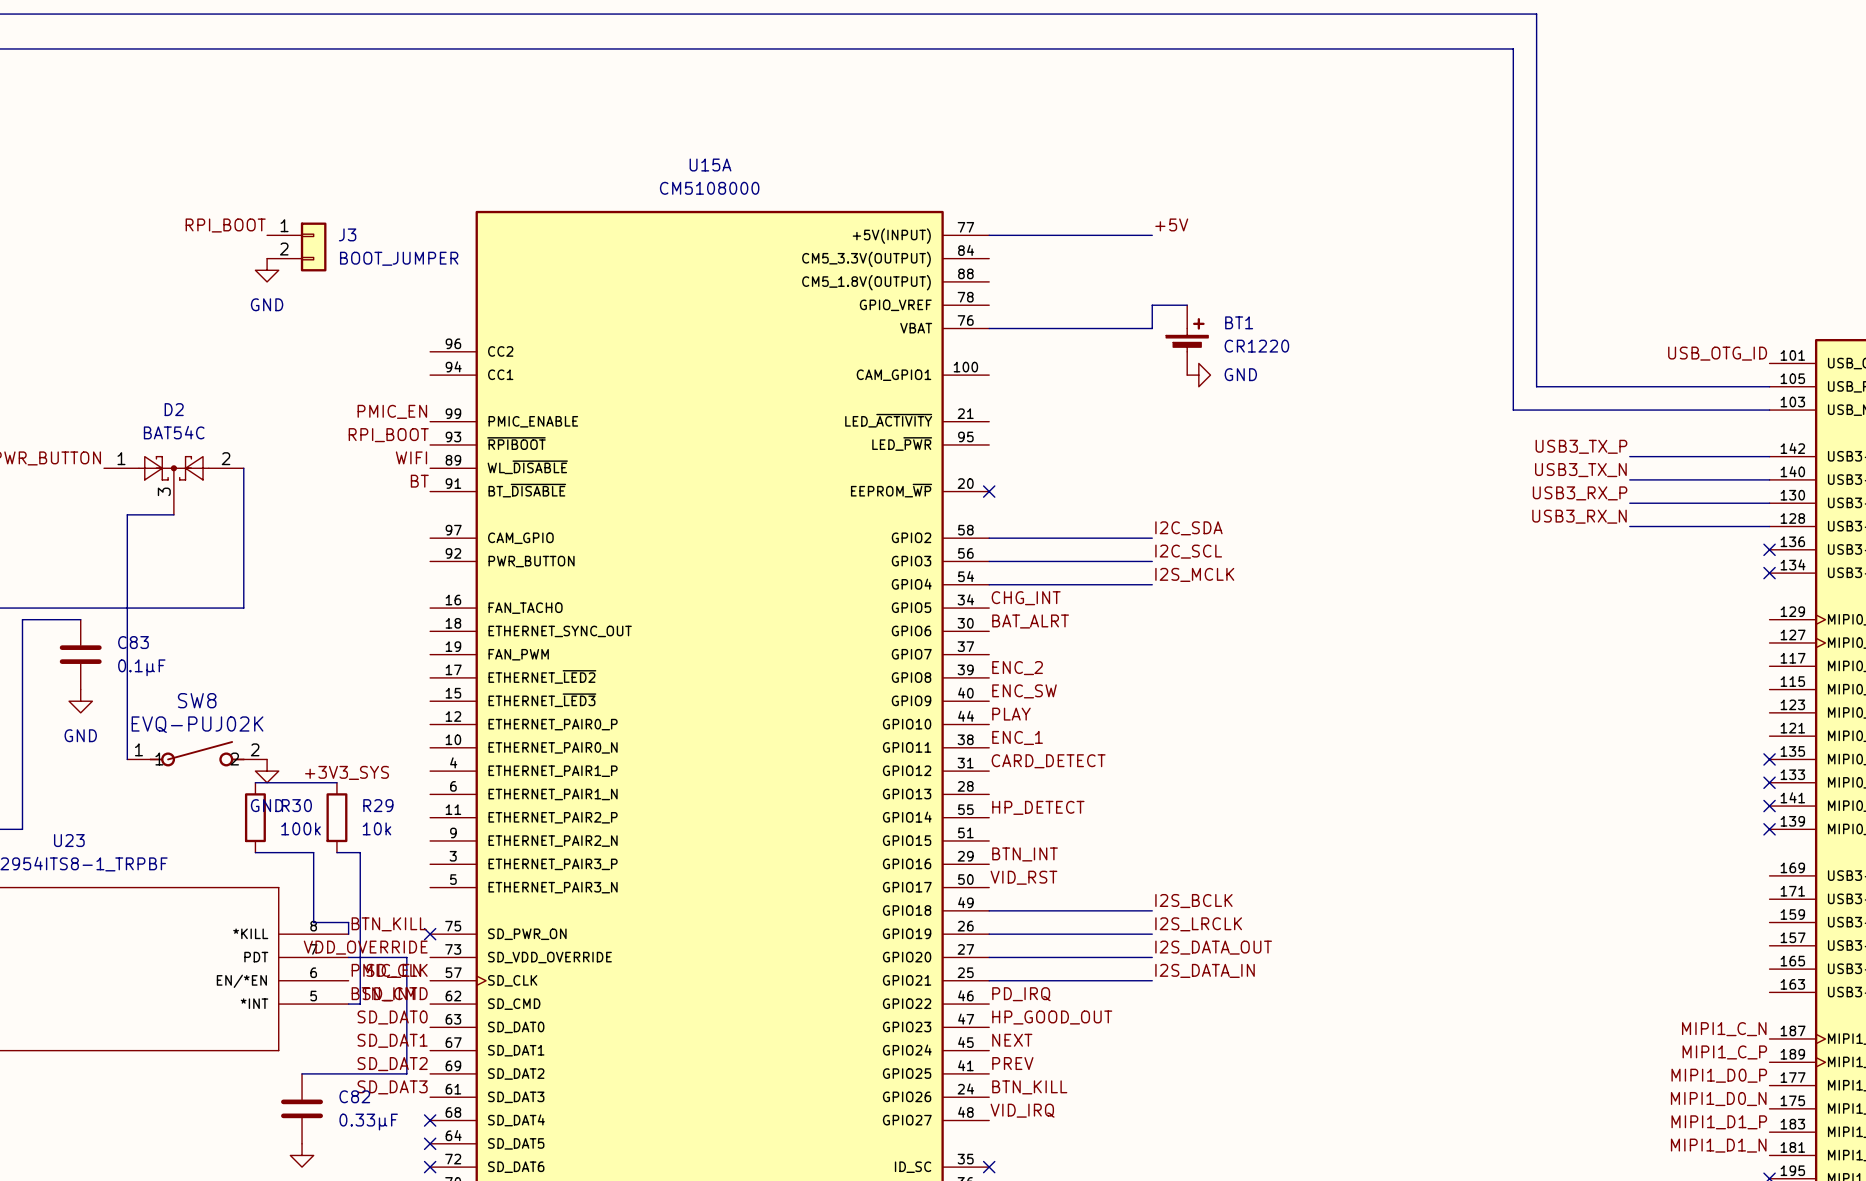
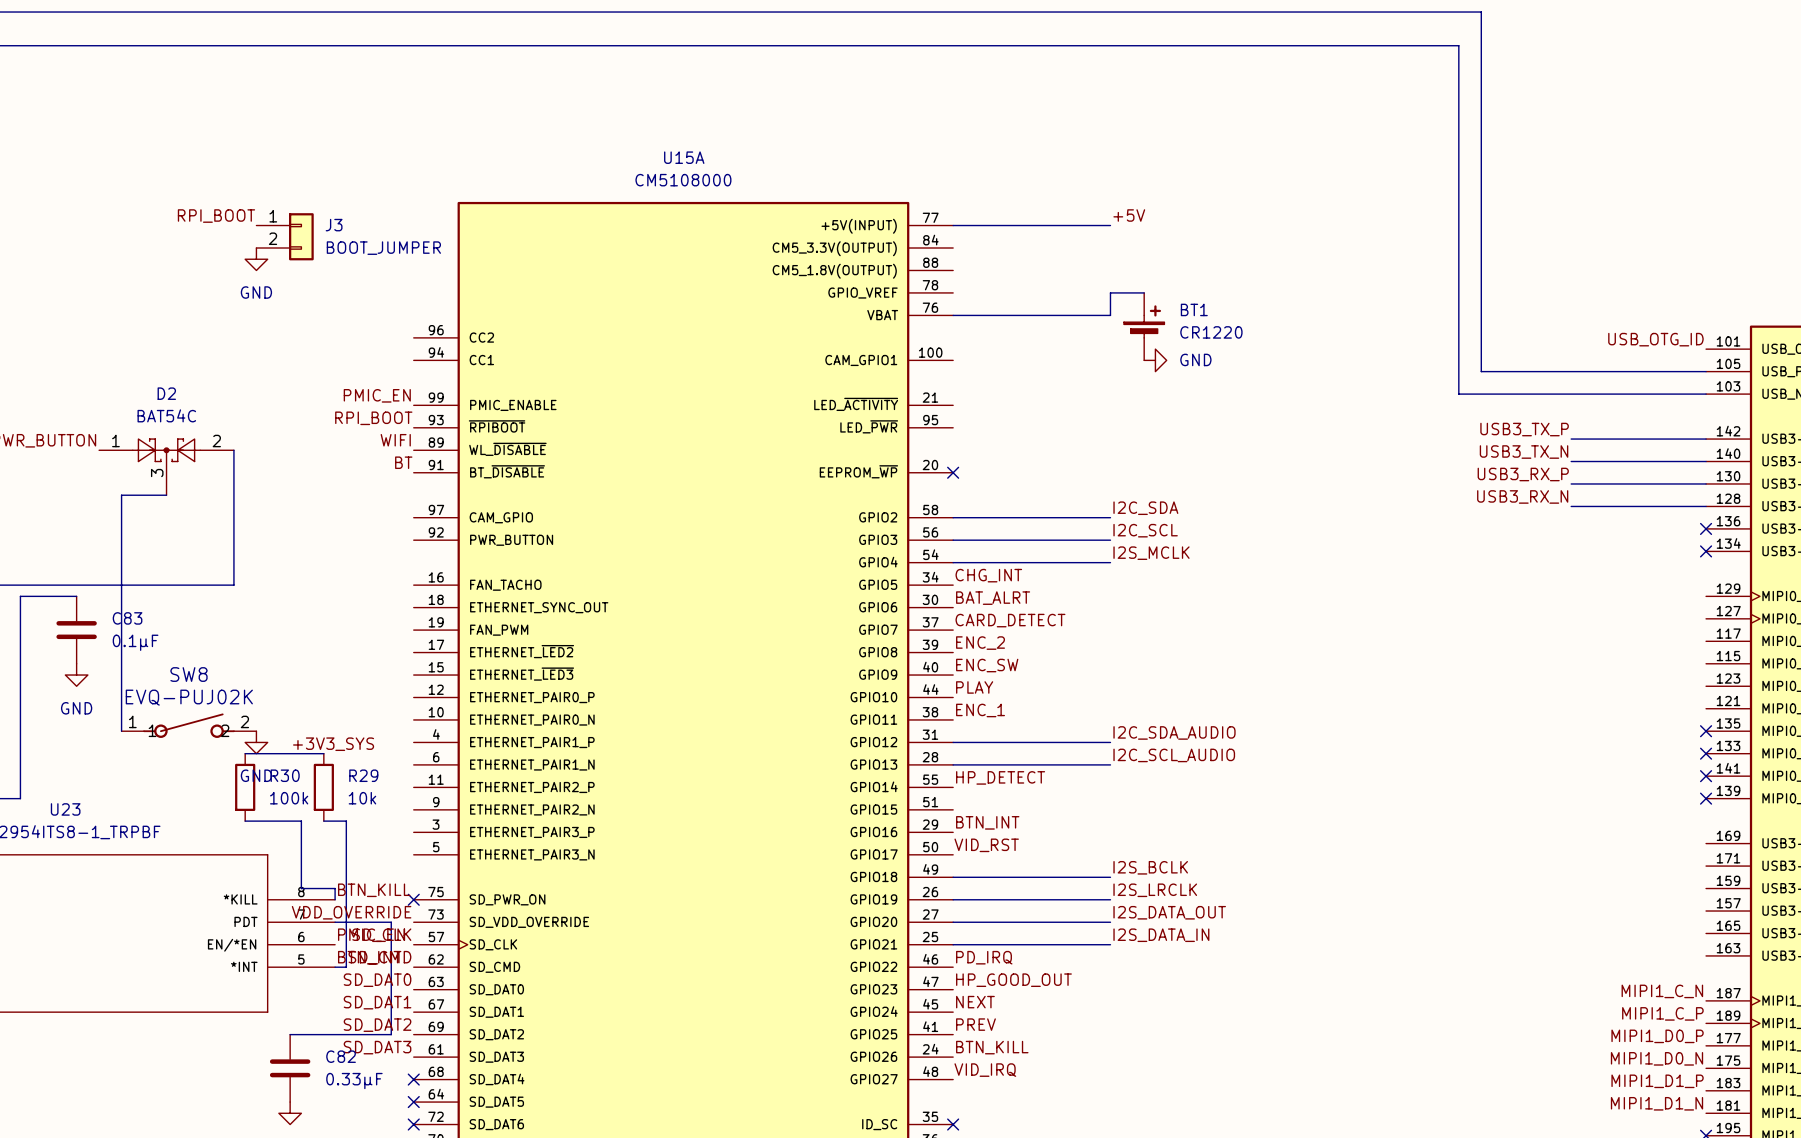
label position: CARD_DETECT (1048, 761) -> CARD_DETECT (1010, 620)
label: none -> I2C_SDA_AUDIO (1174, 732)
wire: none -> (953, 742) (1110, 742)
label: none -> I2C_SCL_AUDIO (1174, 755)
wire: none -> (953, 764) (1110, 764)

